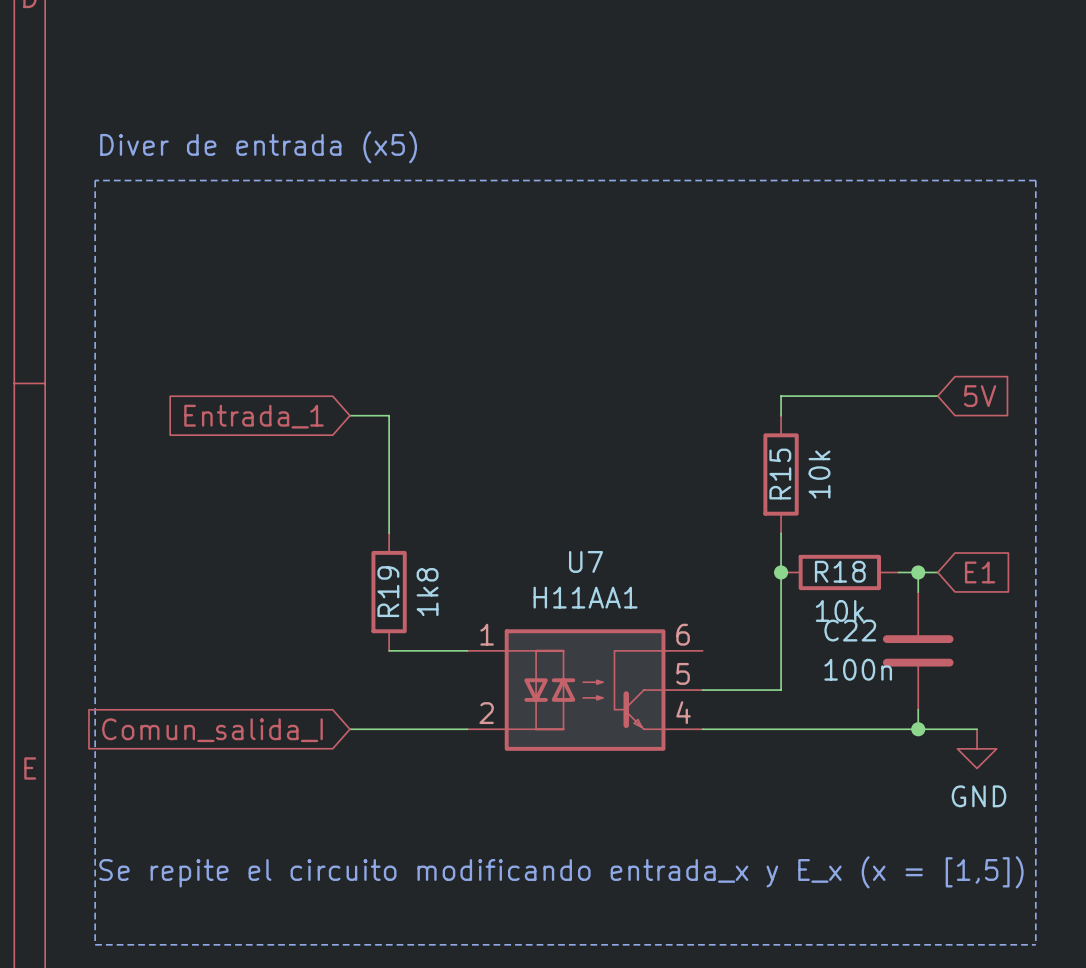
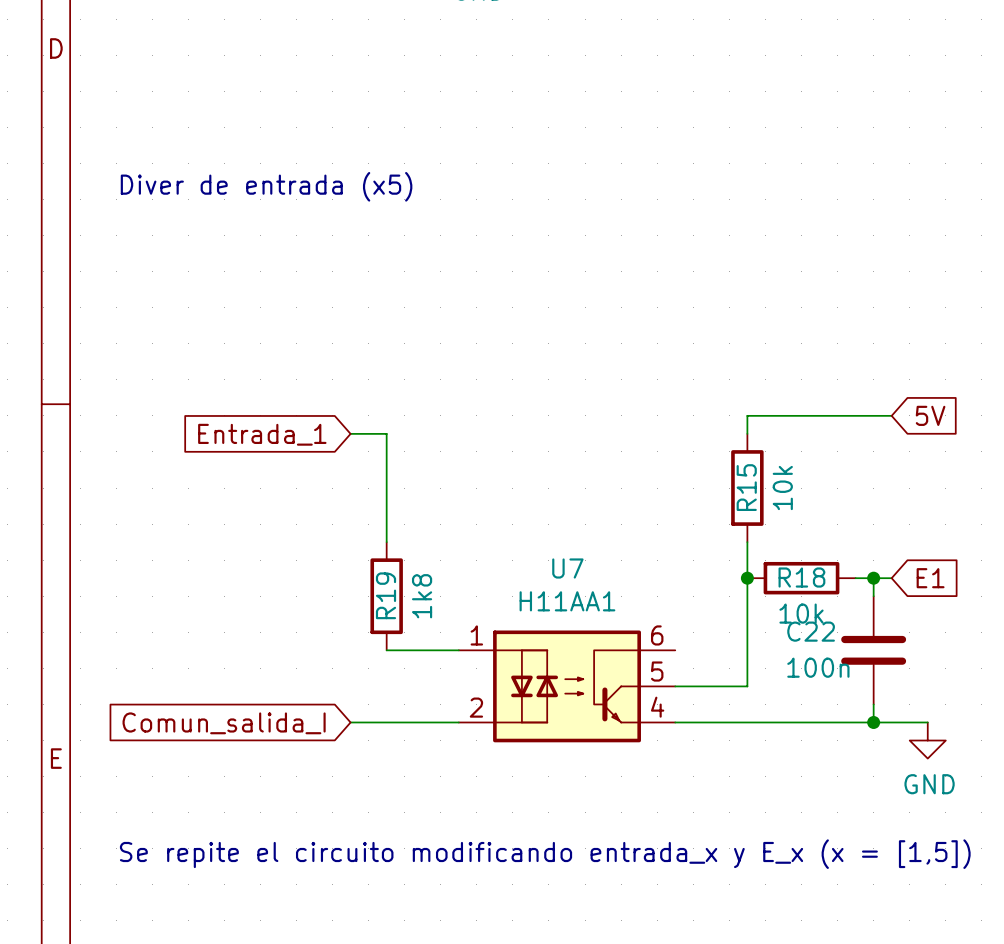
line: (95, 180) (95, 944) (1035, 944) (1035, 180) (95, 180) -> none

